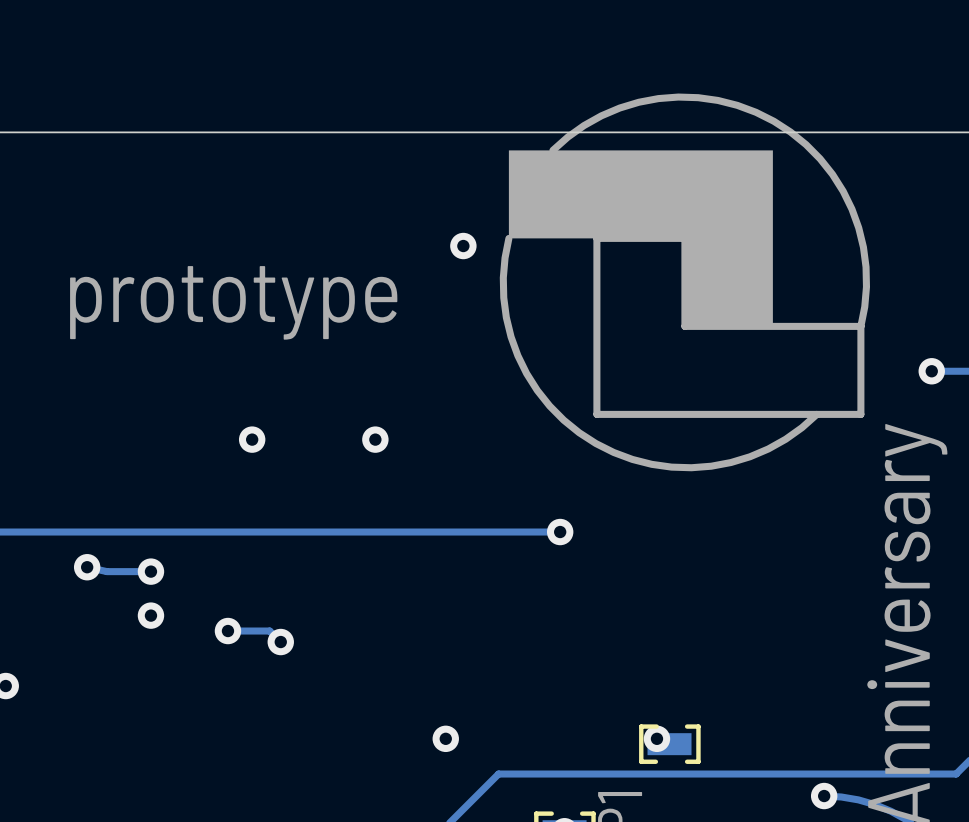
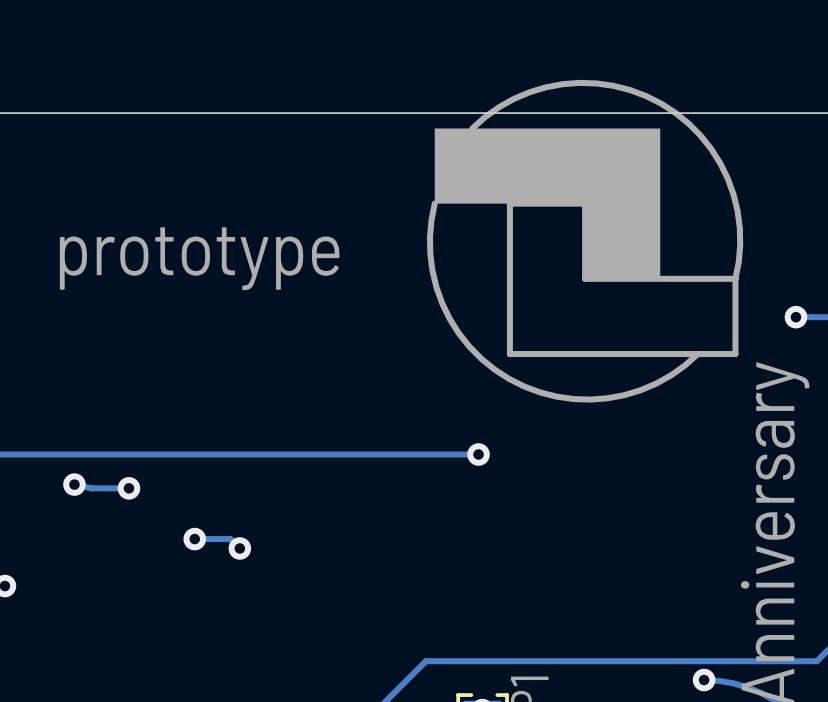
via: (463, 246) -> none
via: (252, 439) -> none
via: (375, 439) -> none
via: (150, 615) -> none
via: (445, 738) -> none
via: (656, 738) -> none
part: (669, 744) -> none

